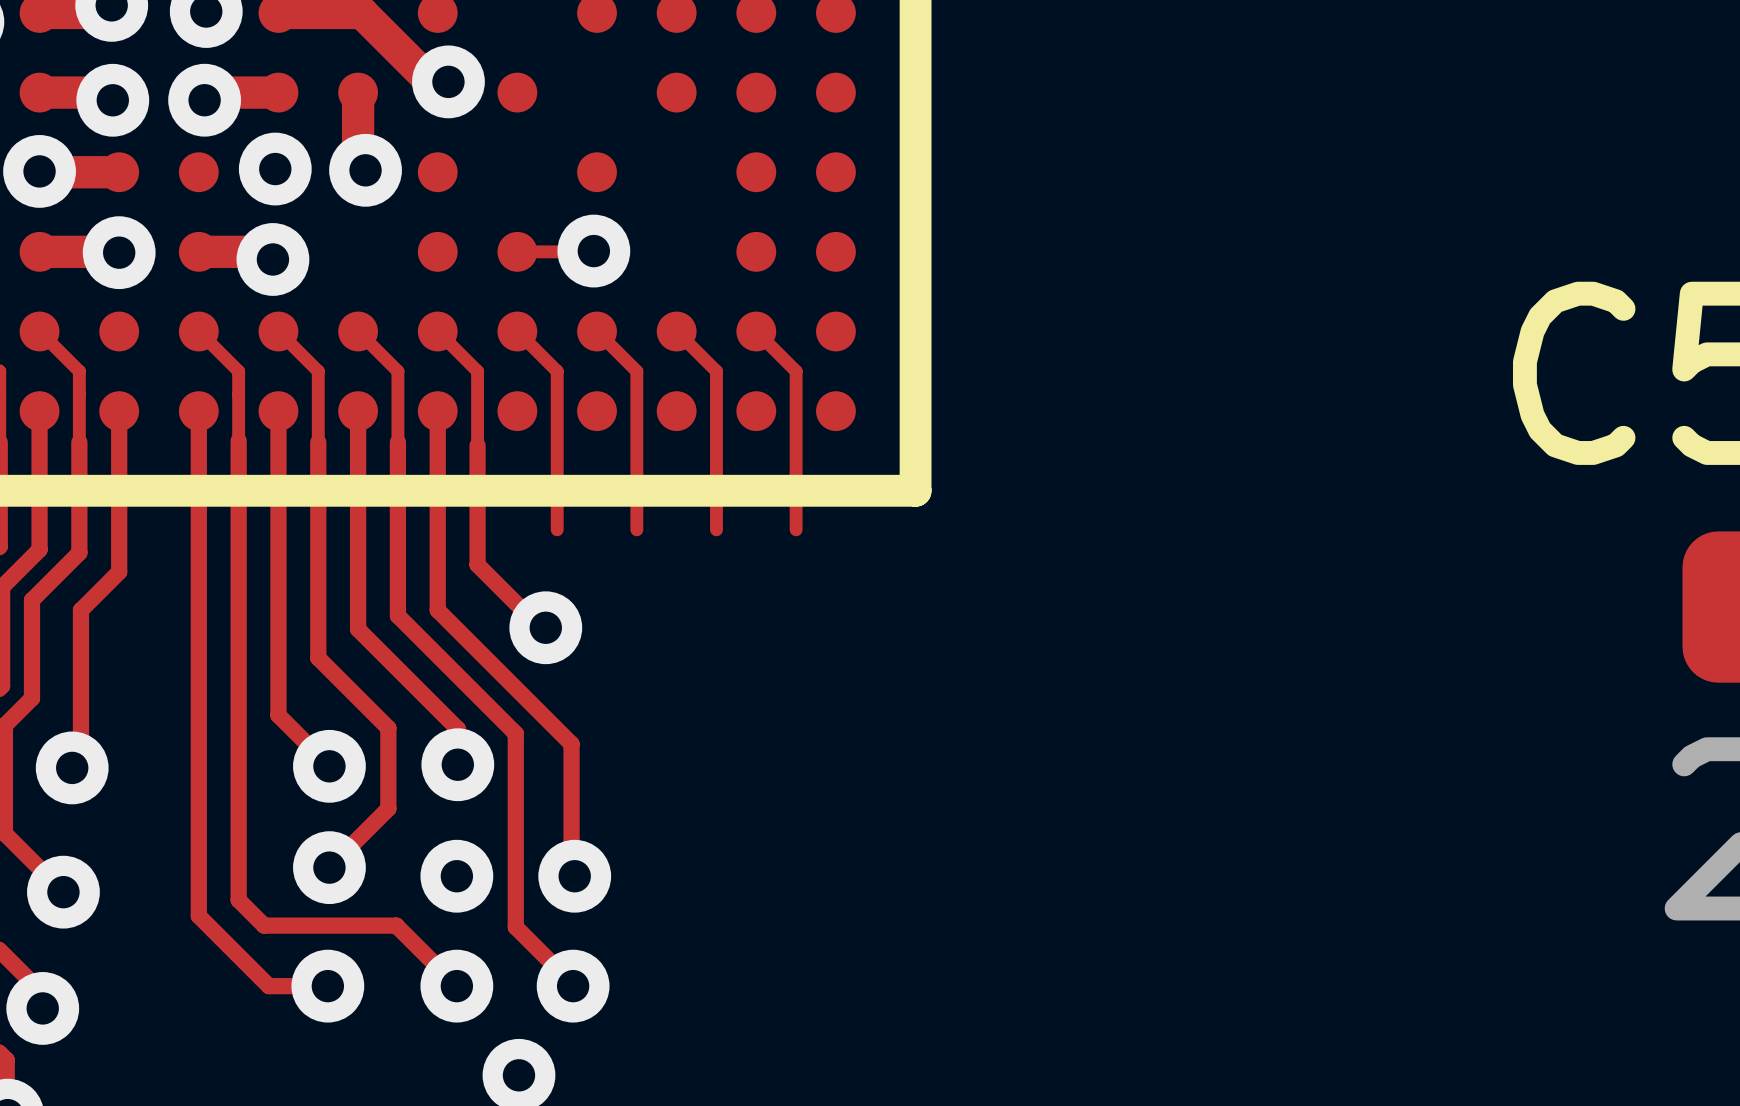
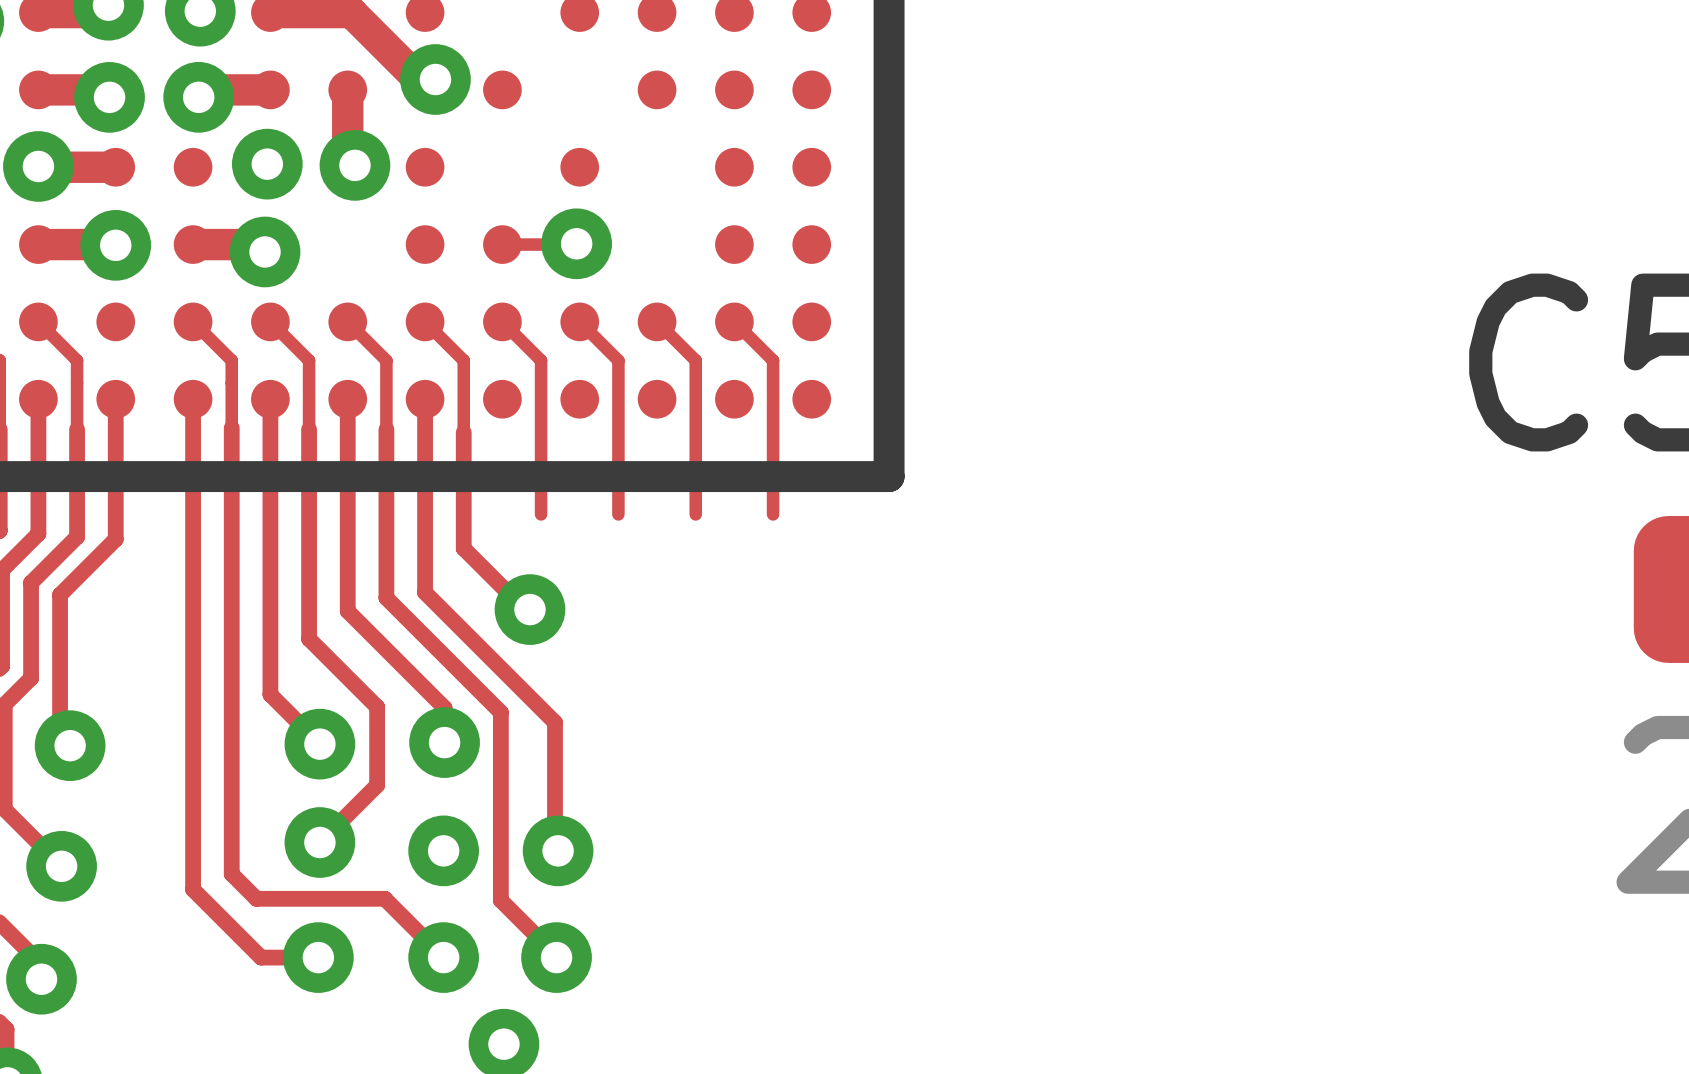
track: (119, 555) (119, 572) (80, 610) (80, 745) (71, 754) (71, 766) -> (115, 539) (60, 594) (60, 740)

